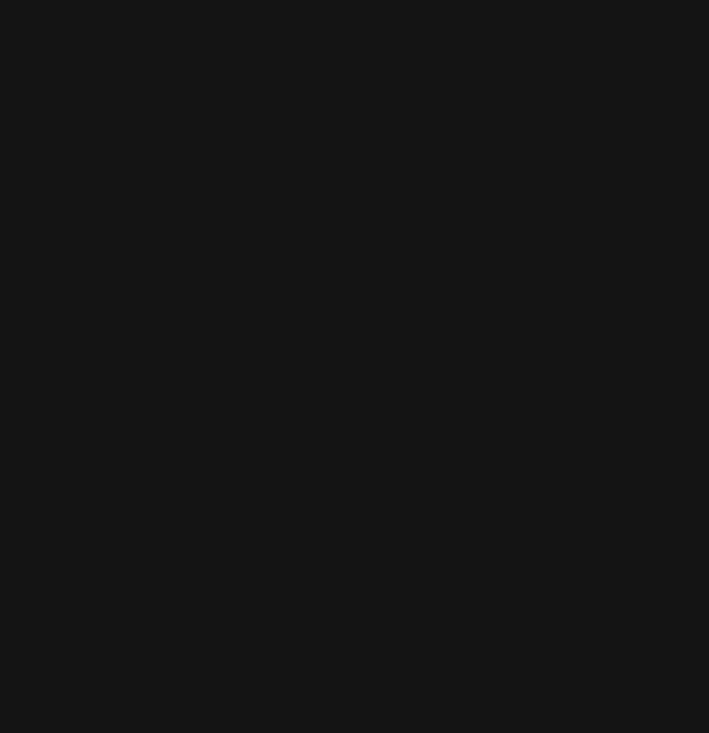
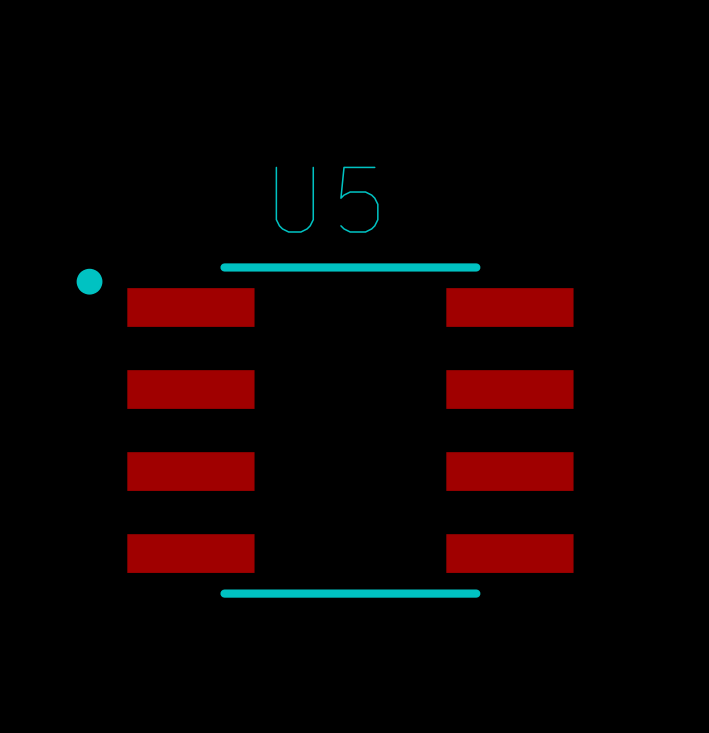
U5: none -> (325, 430)

